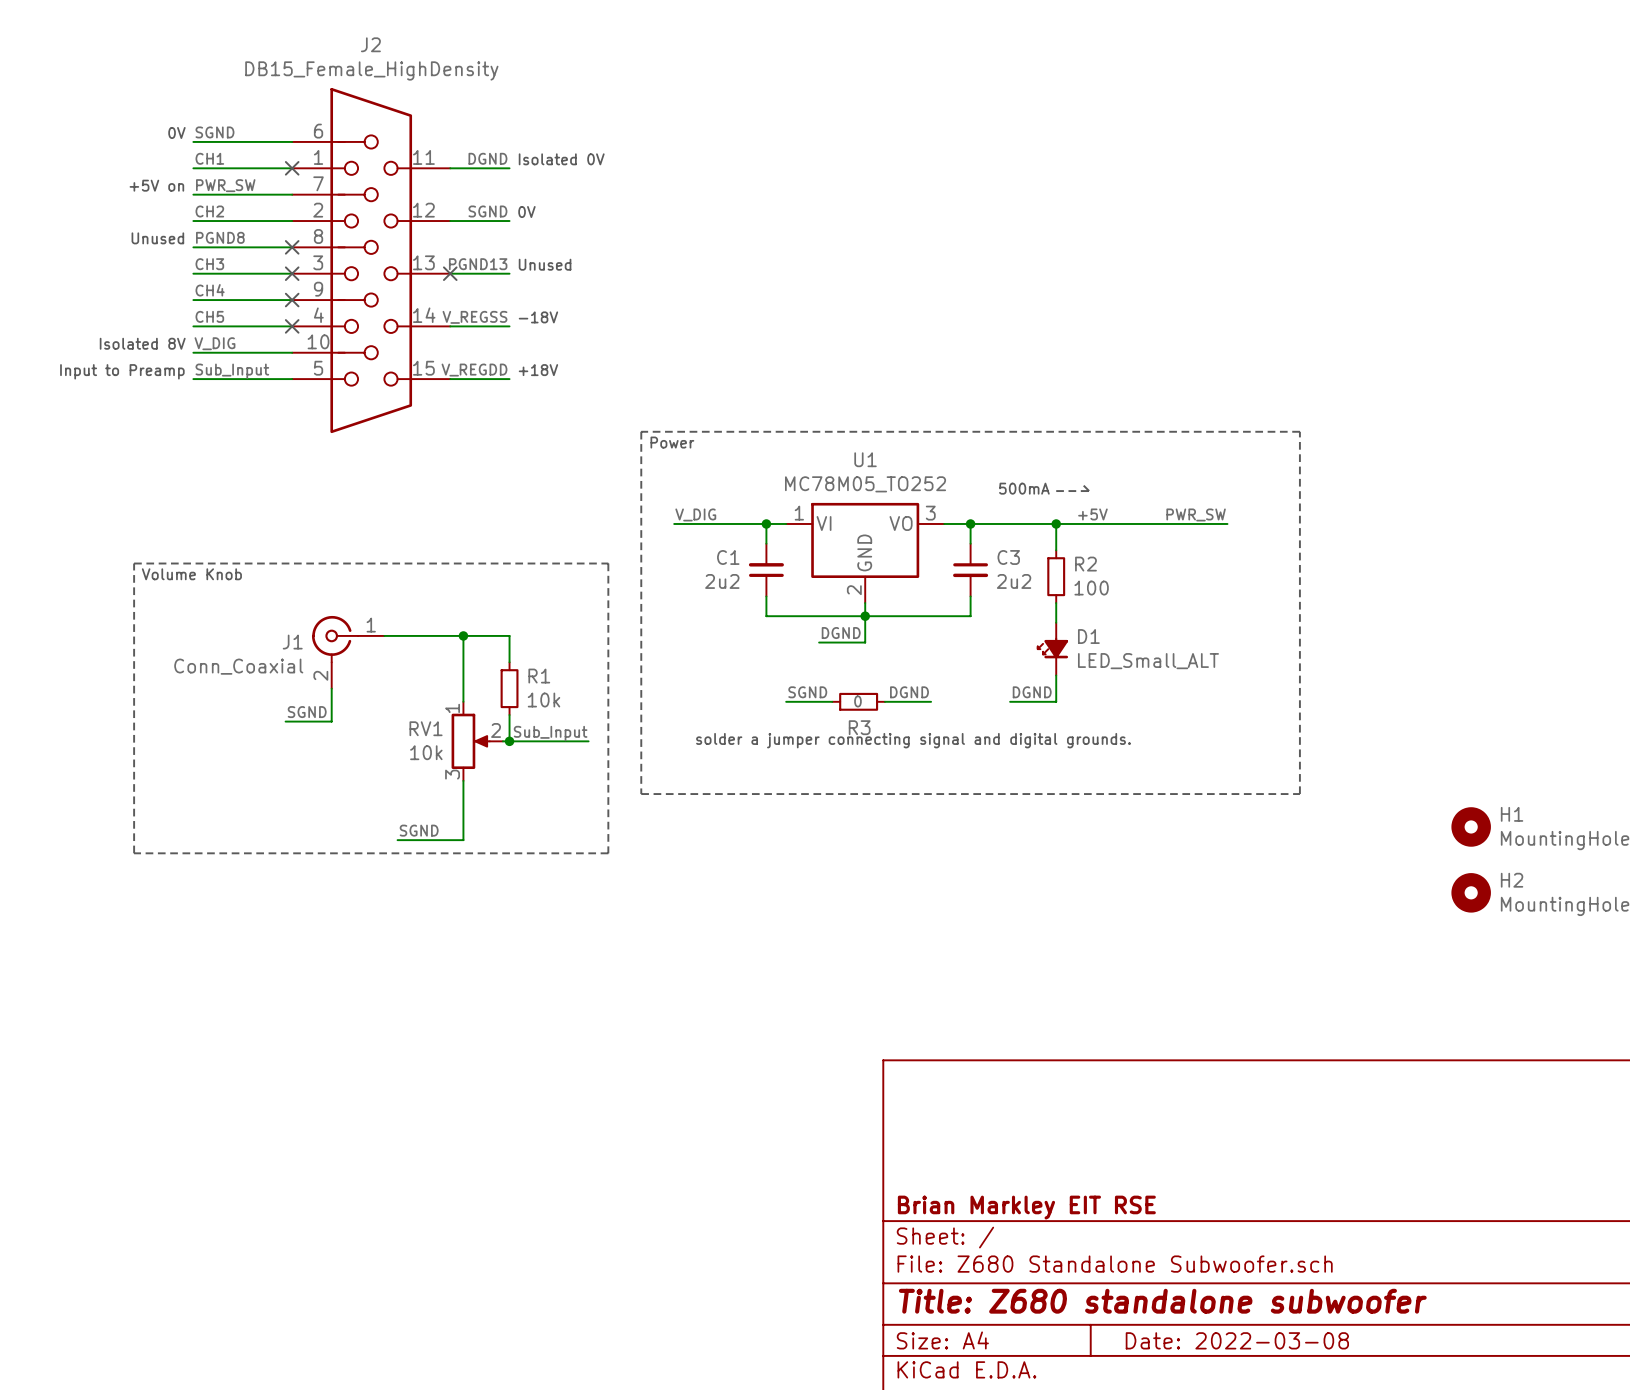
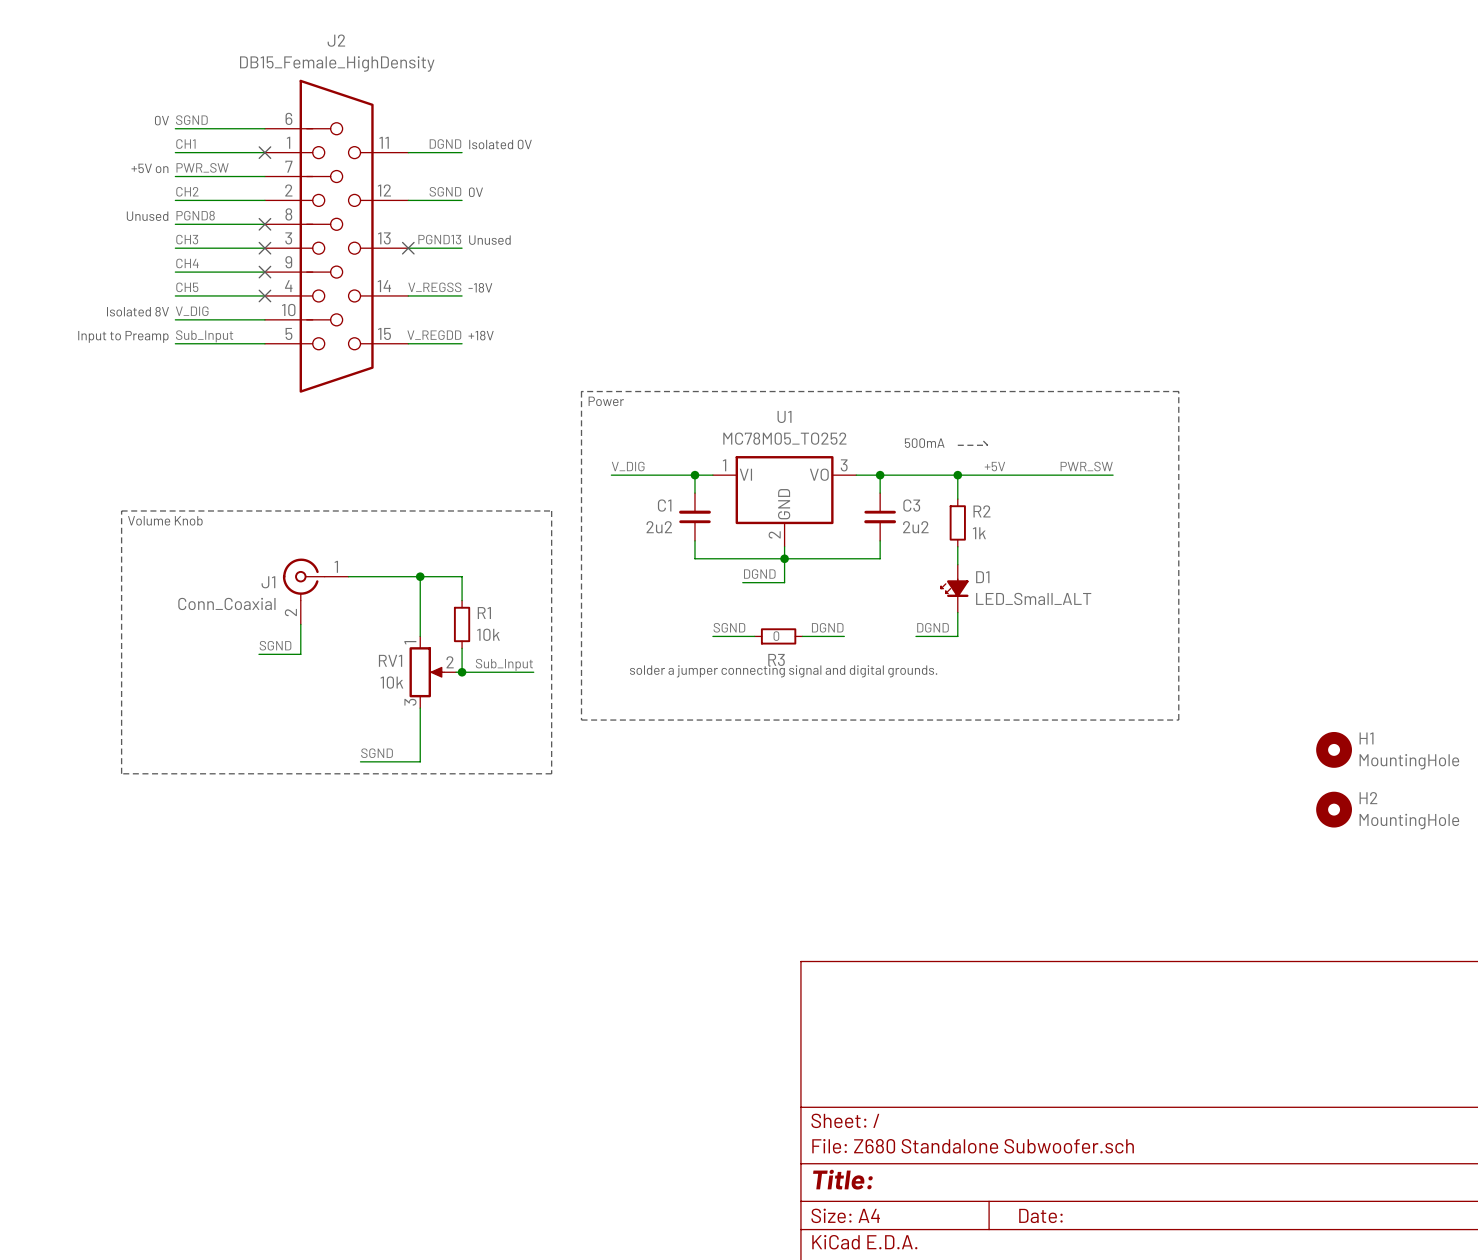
R2 value: 100 (1091, 588) -> 1k (979, 533)
title block: Brian Markley EIT RSE (1026, 1207) -> none
title block: Title: Z680 standalone subwoofer (1162, 1301) -> Title: (842, 1179)
title block: Date: 2022-03-08 (1237, 1340) -> Date: (1040, 1215)

